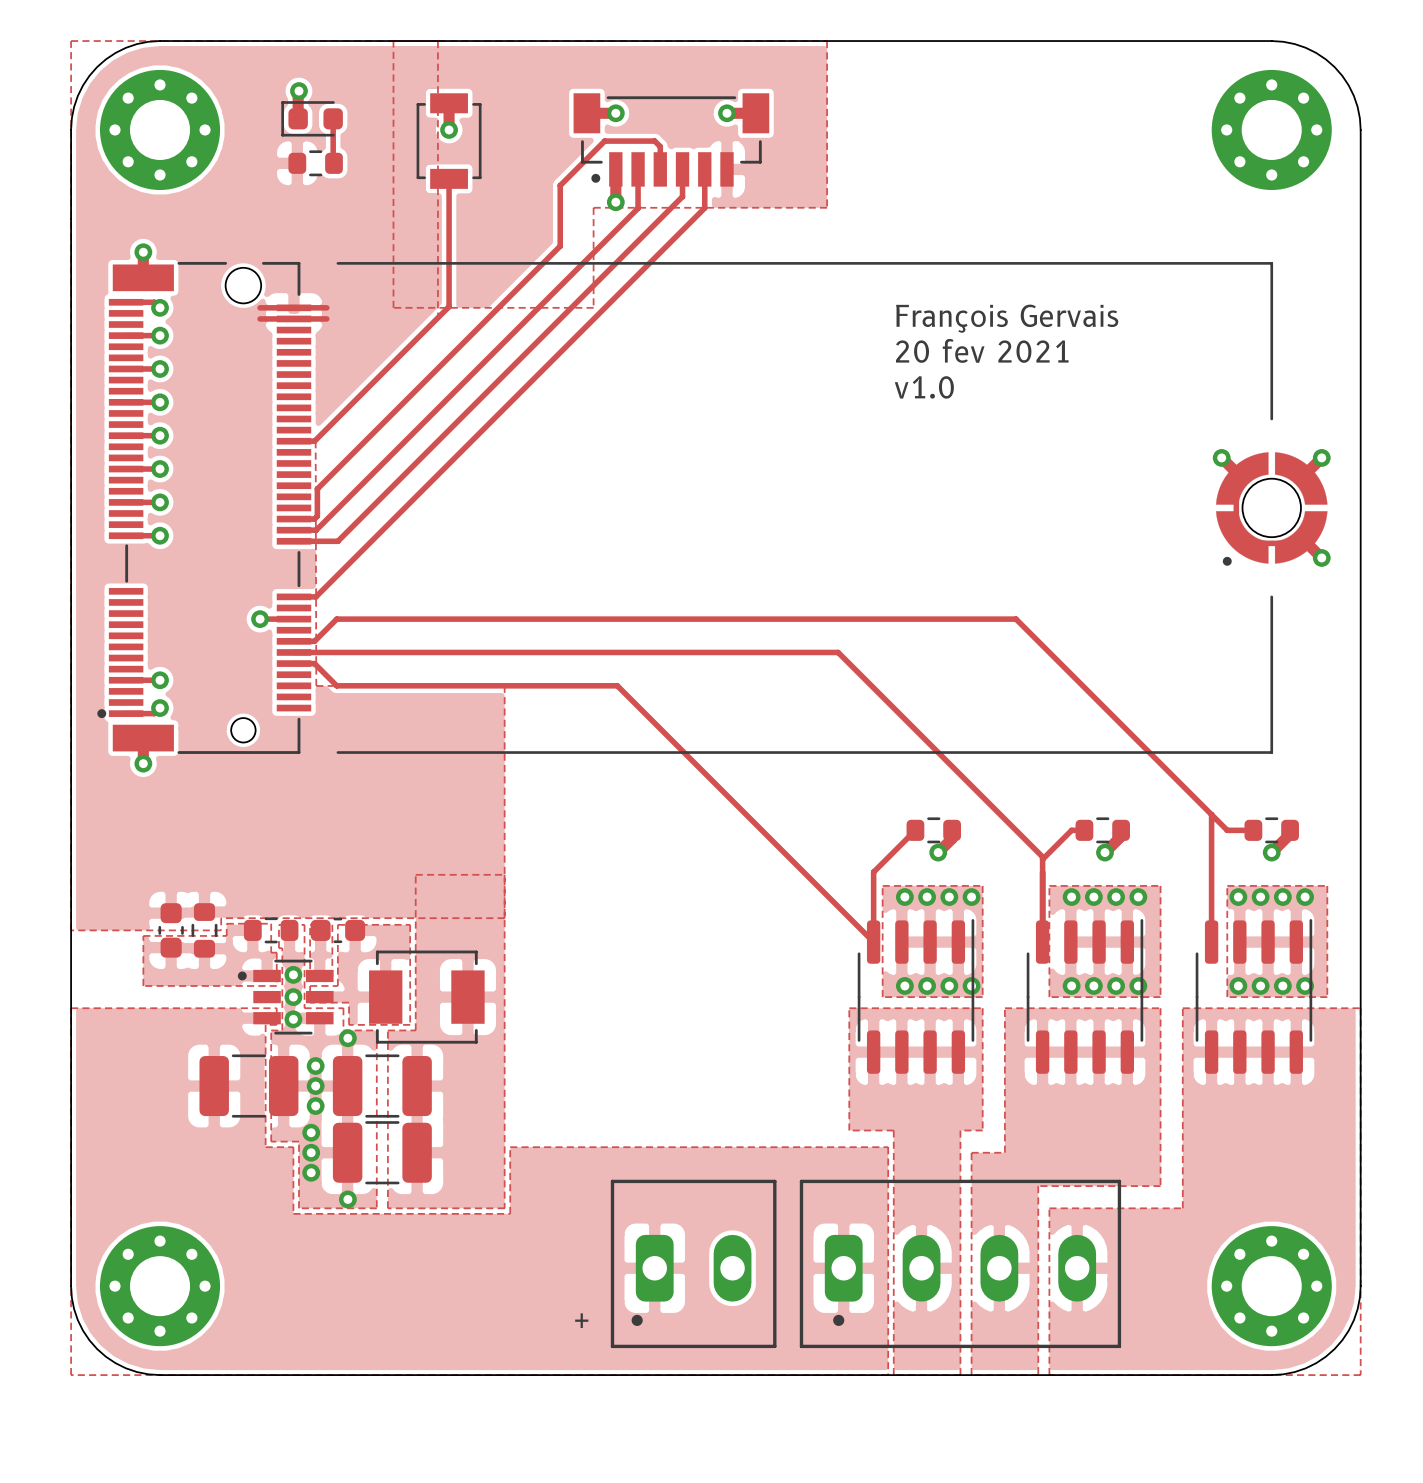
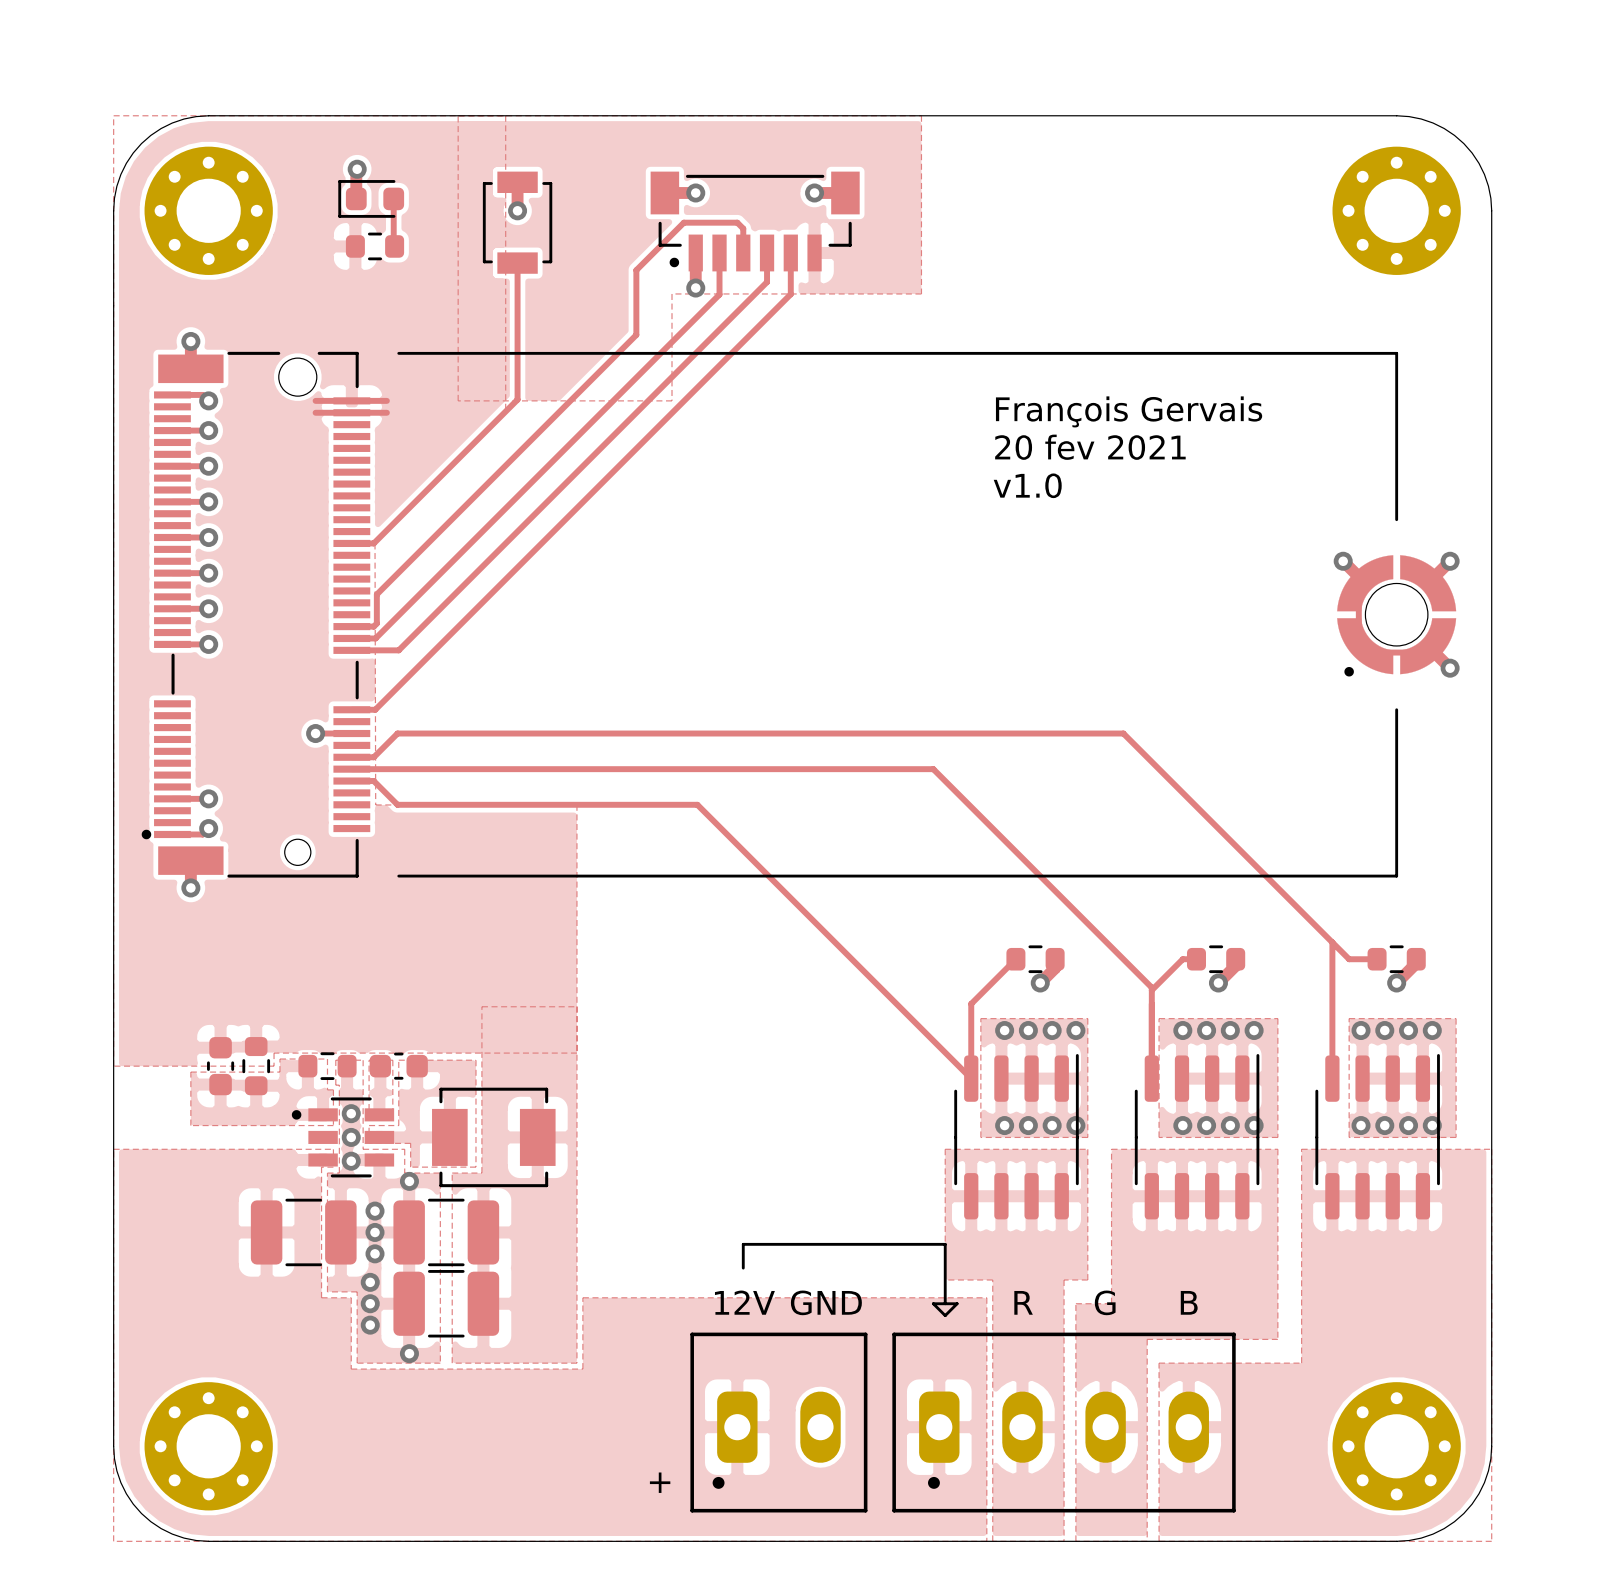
line: none -> (743, 1268) (743, 1244) (945, 1244) (945, 1303)
text: none -> R (1023, 1302)
text: none -> B (1189, 1302)
text: none -> 12V (744, 1302)
text: none -> GND (826, 1302)
line: none -> (933, 1303) (945, 1315) (957, 1303) (933, 1303)
text: none -> G (1105, 1302)

